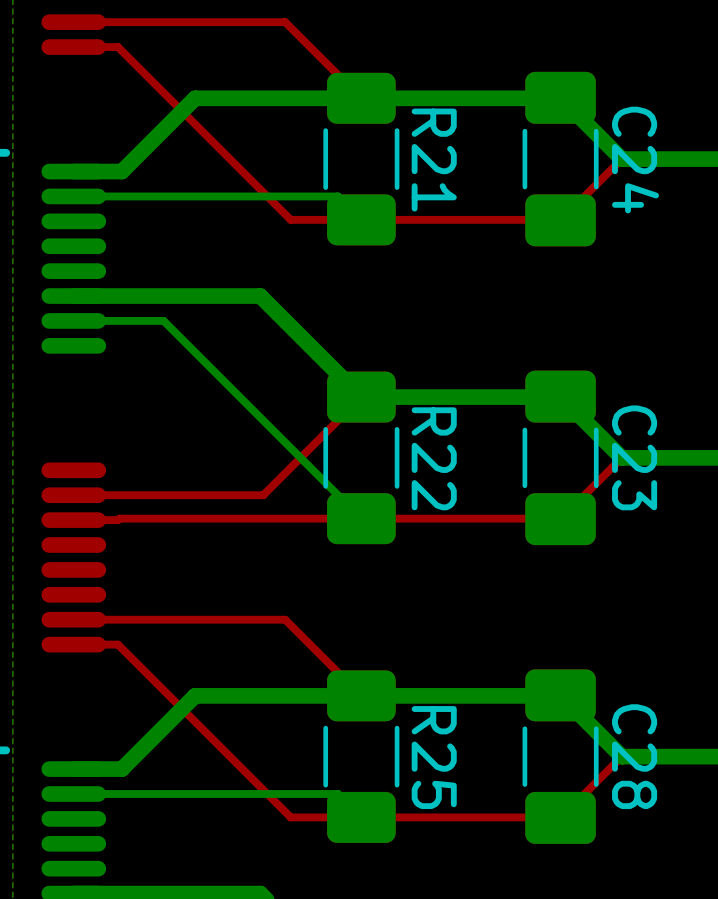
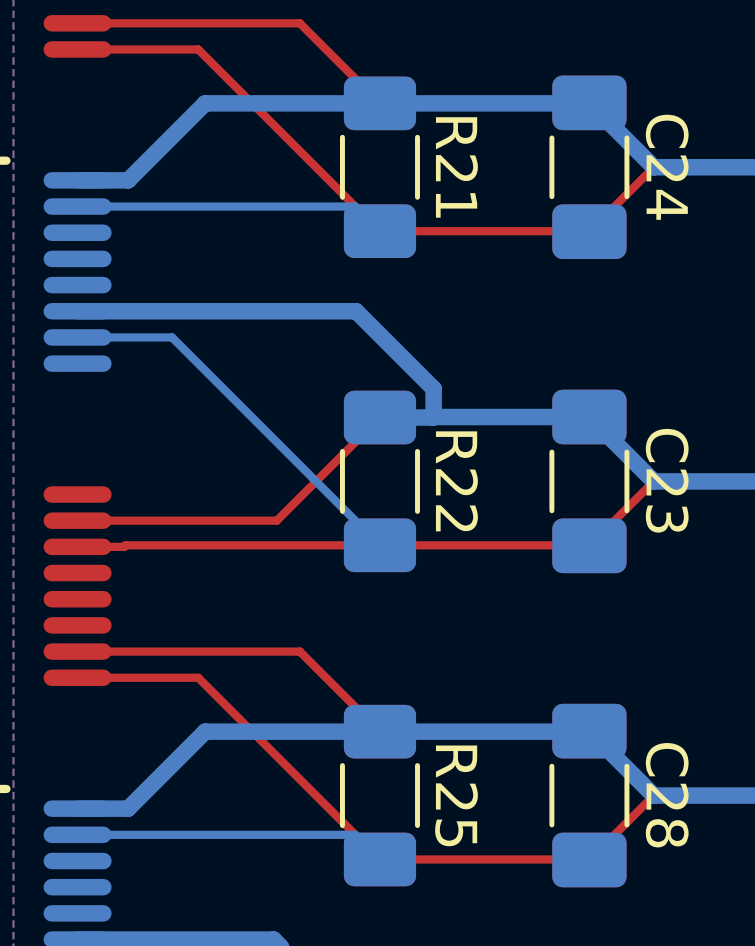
top track: (117, 47) (290, 219) (361, 219) -> (124, 49) (198, 49) (379, 231)
bottom track: (260, 296) (361, 397) -> none
bottom track: (560, 397) (411, 397) -> (589, 417) (433, 417) (433, 388) (356, 311) (273, 311)
top track: (117, 644) (290, 817) (361, 817) -> (124, 677) (198, 677) (379, 859)

